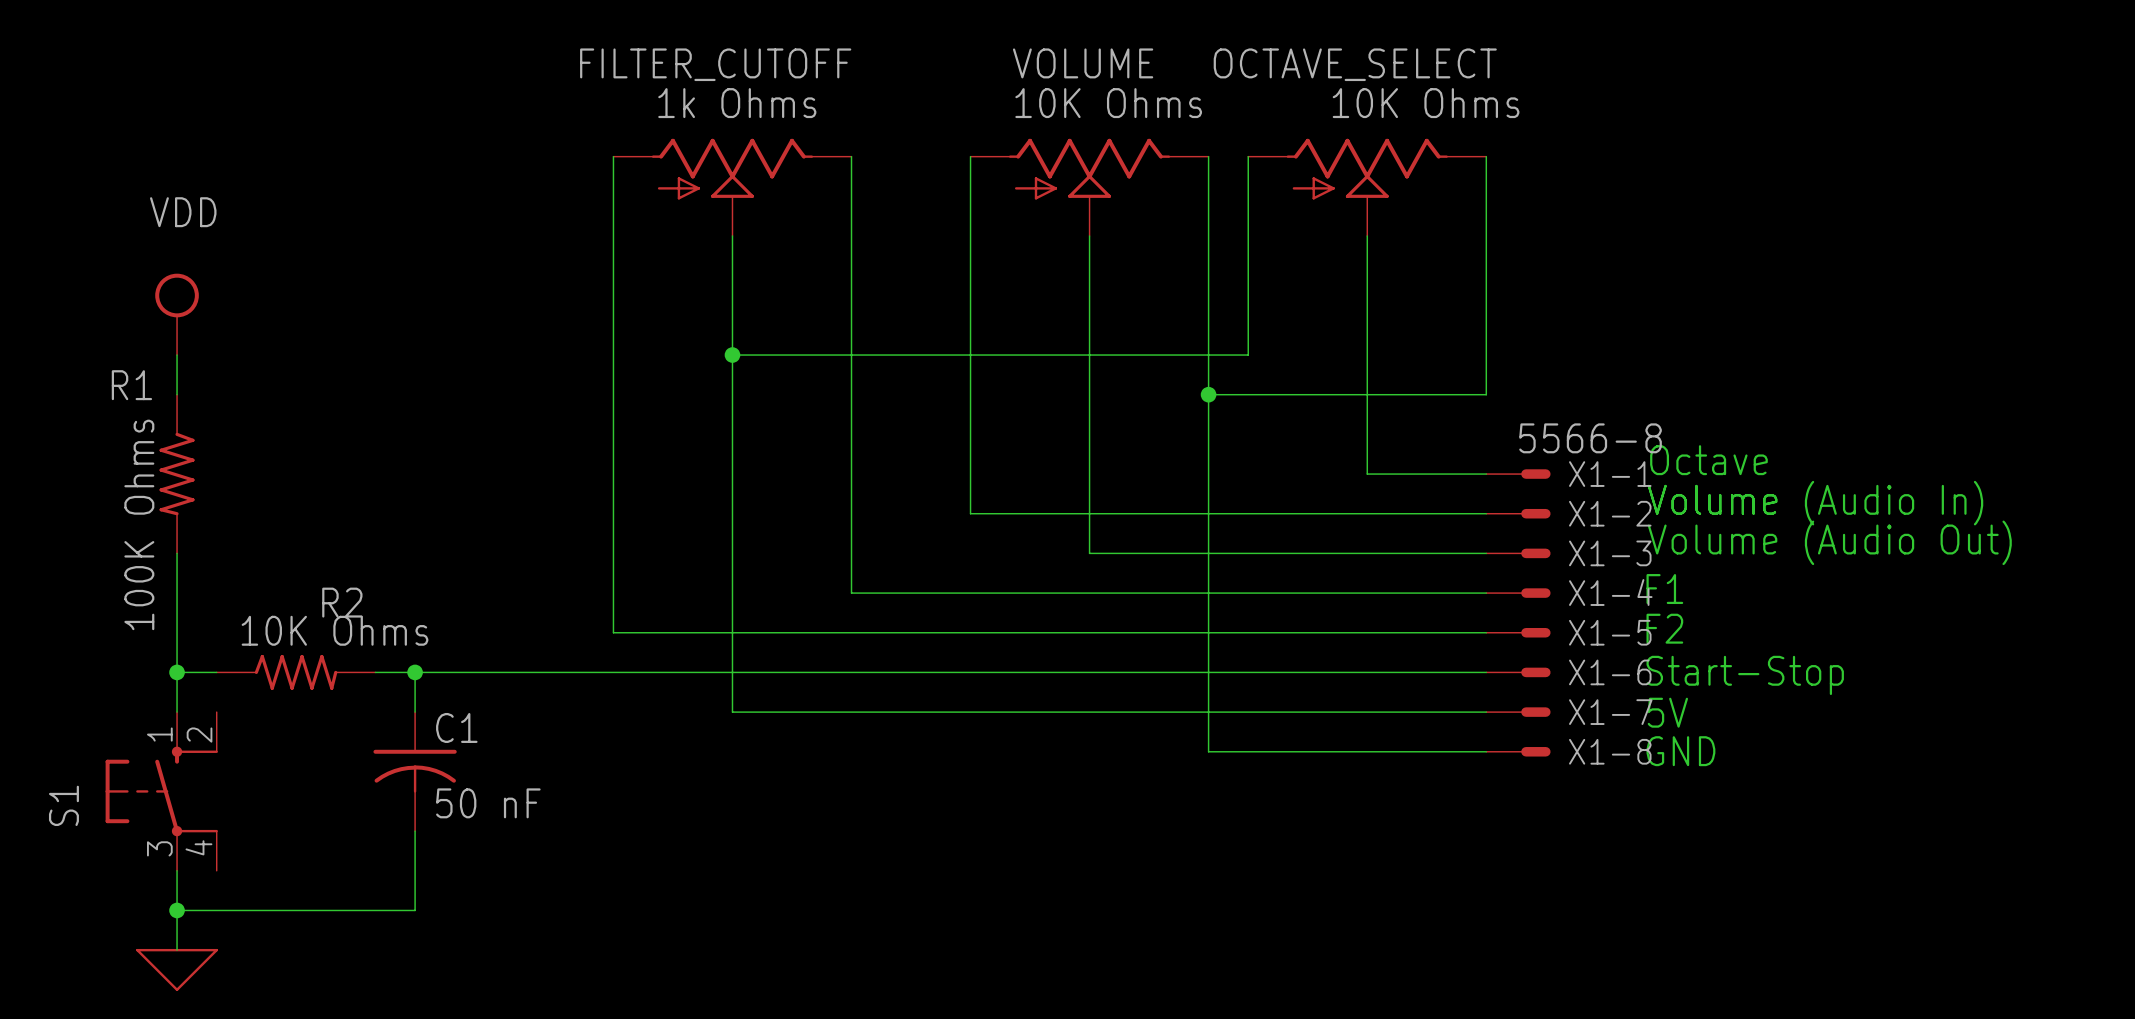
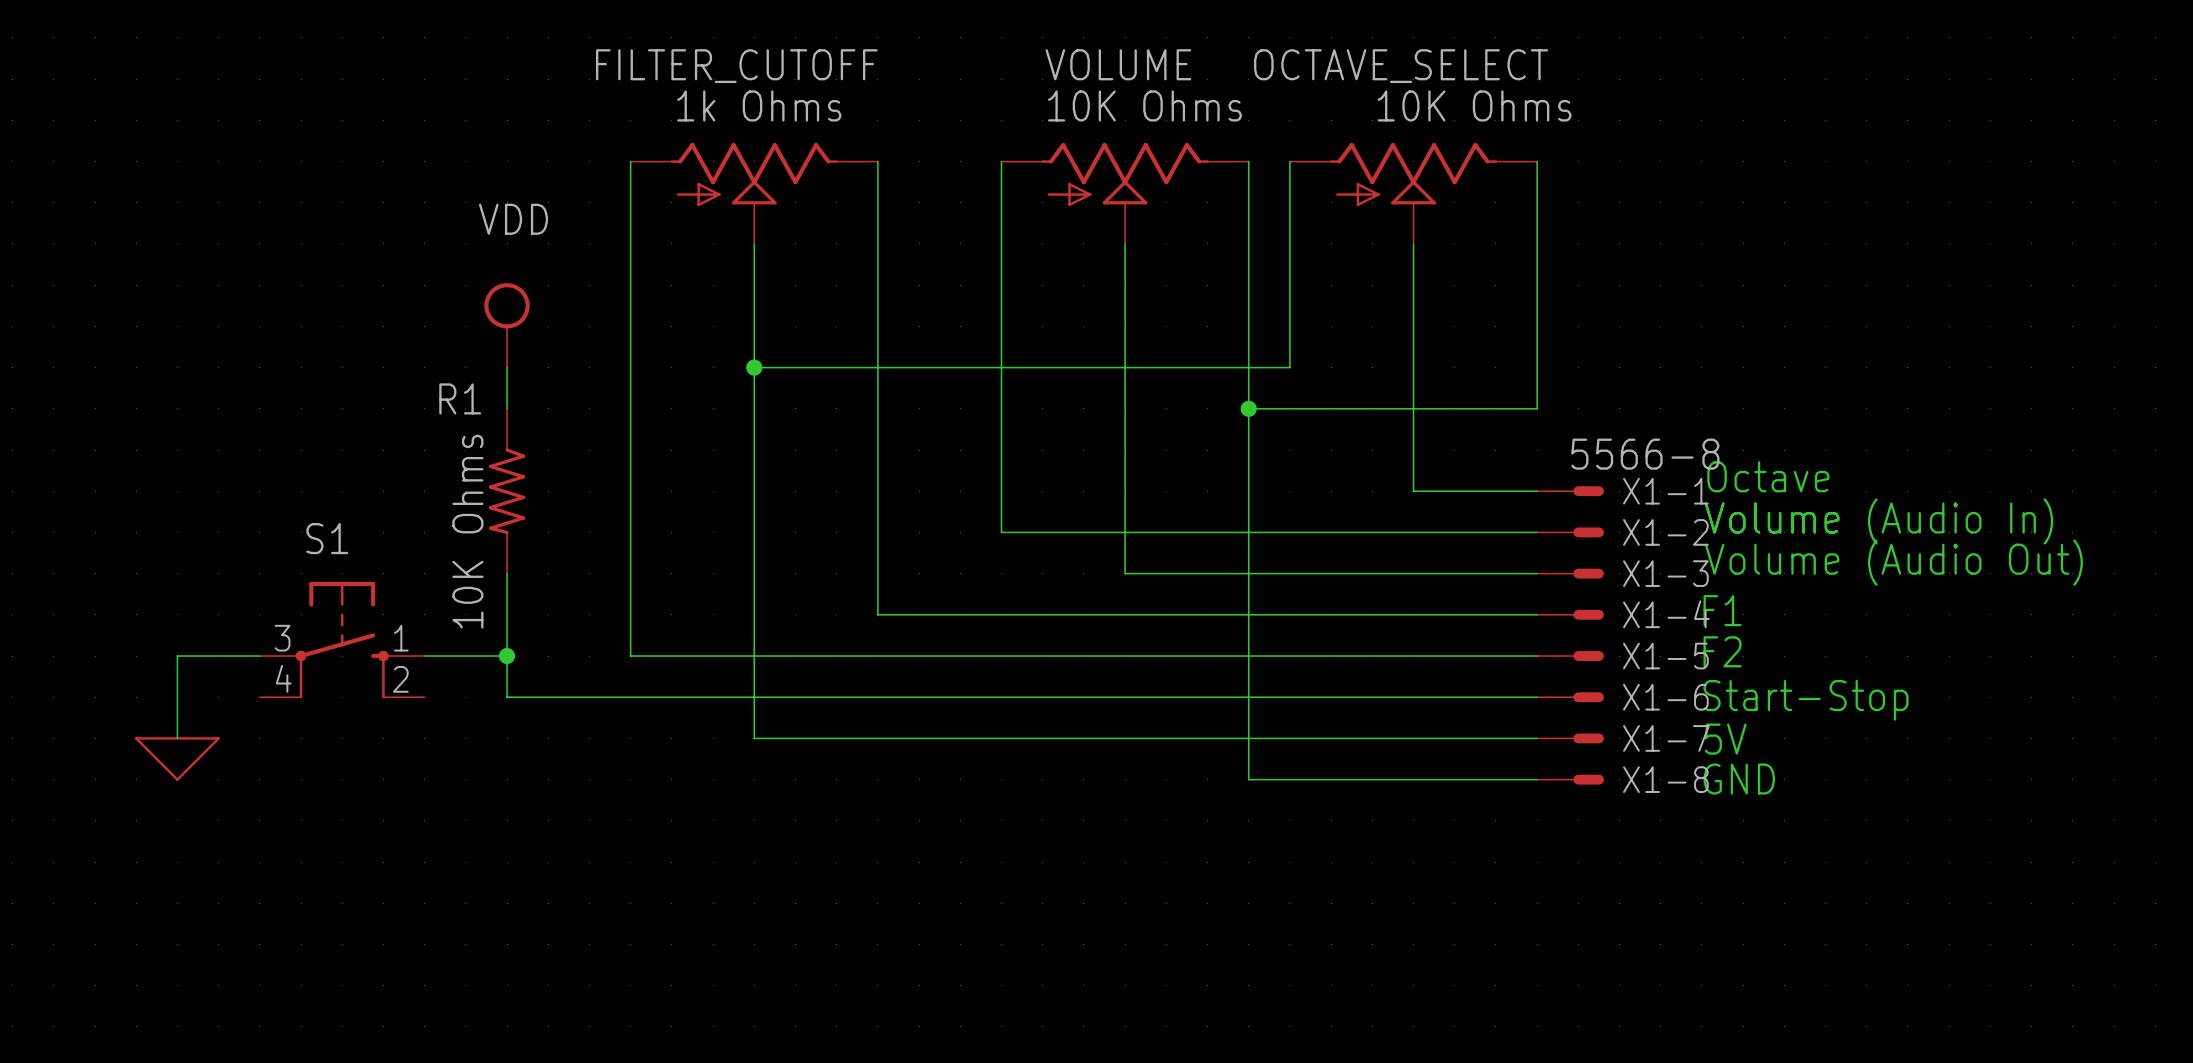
power symbol position: VDD (177, 314) -> VDD (507, 325)
wire: (177, 355) (177, 394) -> (507, 367) (507, 408)
R1 position: (177, 474) -> (507, 491)
R1 value: 100K Ohms (139, 524) -> 10K Ohms (467, 531)
wire: (177, 553) (177, 632) -> (259, 656) (177, 656)
wire: none -> (424, 656) (507, 656)
wire: (177, 672) (216, 672) -> none
junction: (177, 672) -> none
R2: 10K Ohms (296, 672) -> none
wire: (375, 672) (494, 672) -> (507, 573) (507, 697)
wire: (415, 672) (415, 712) -> none
junction position: (415, 672) -> (507, 656)
C1: 50 nF (415, 771) -> none
S1 rotation: 0° (161, 791) -> 90° clockwise (342, 640)
S1 position: (161, 791) -> (342, 640)
wire: (415, 831) (415, 910) (177, 910) -> none
wire: (177, 870) (177, 950) -> none
junction: (177, 910) -> none
power symbol position: (177, 969) -> (177, 759)

